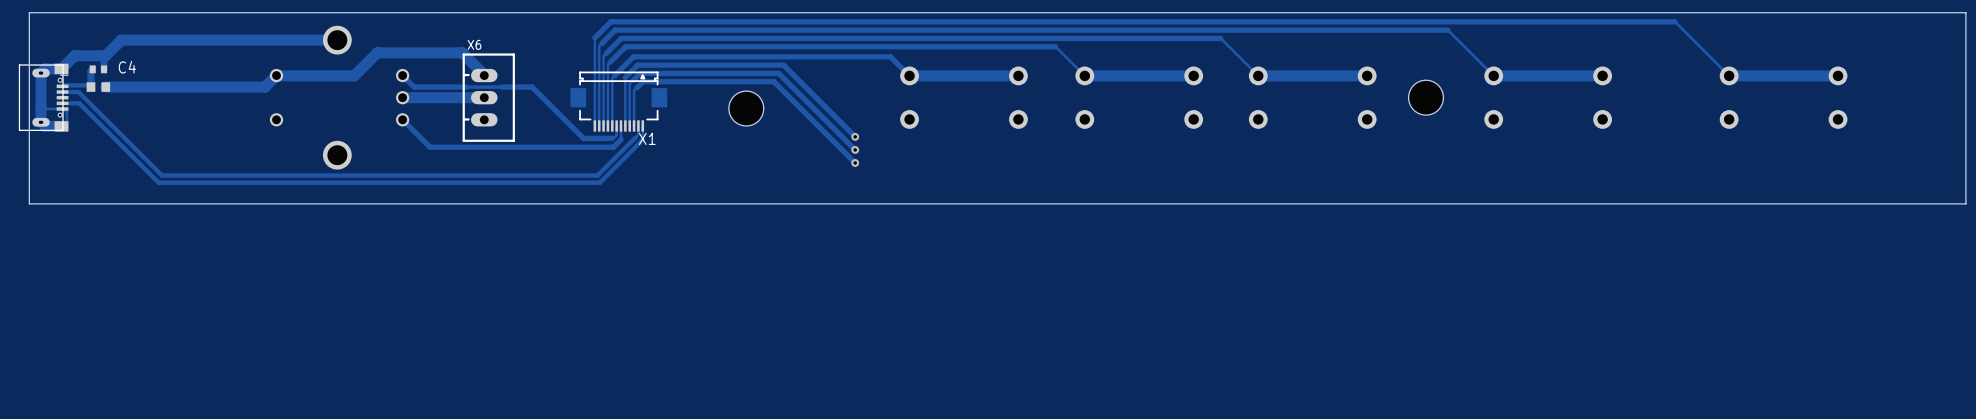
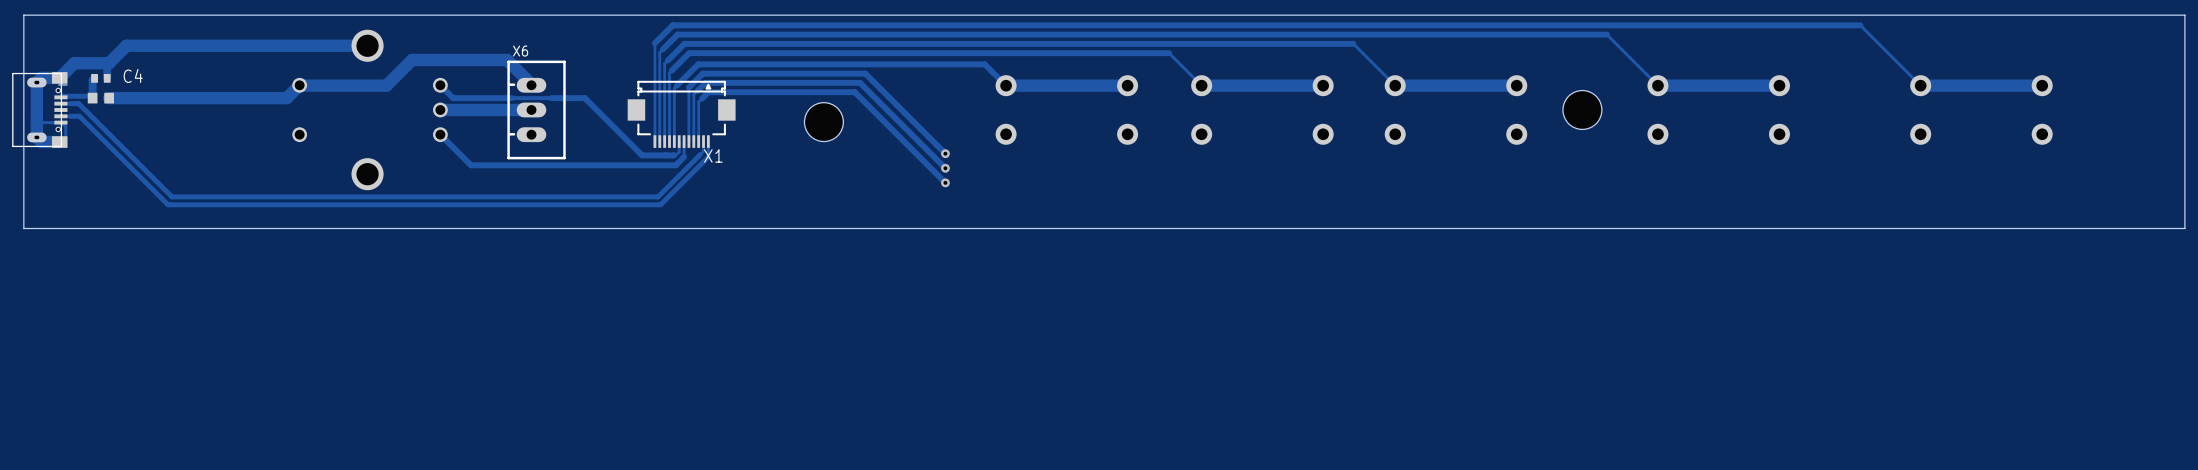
X1 footprint: [570, 71, 668, 132] -> [627, 80, 736, 148]

